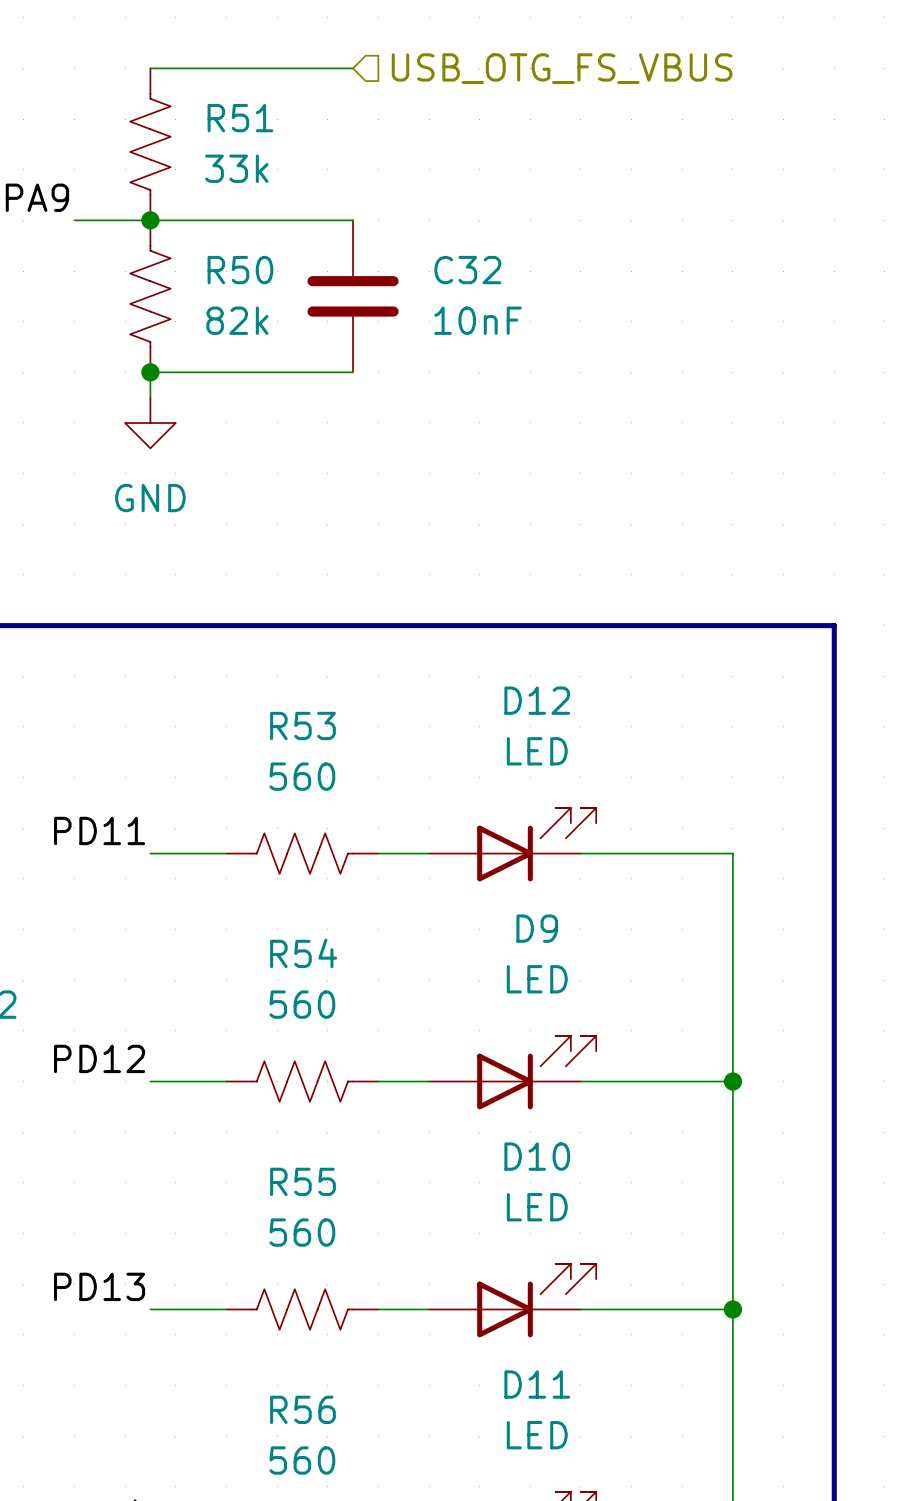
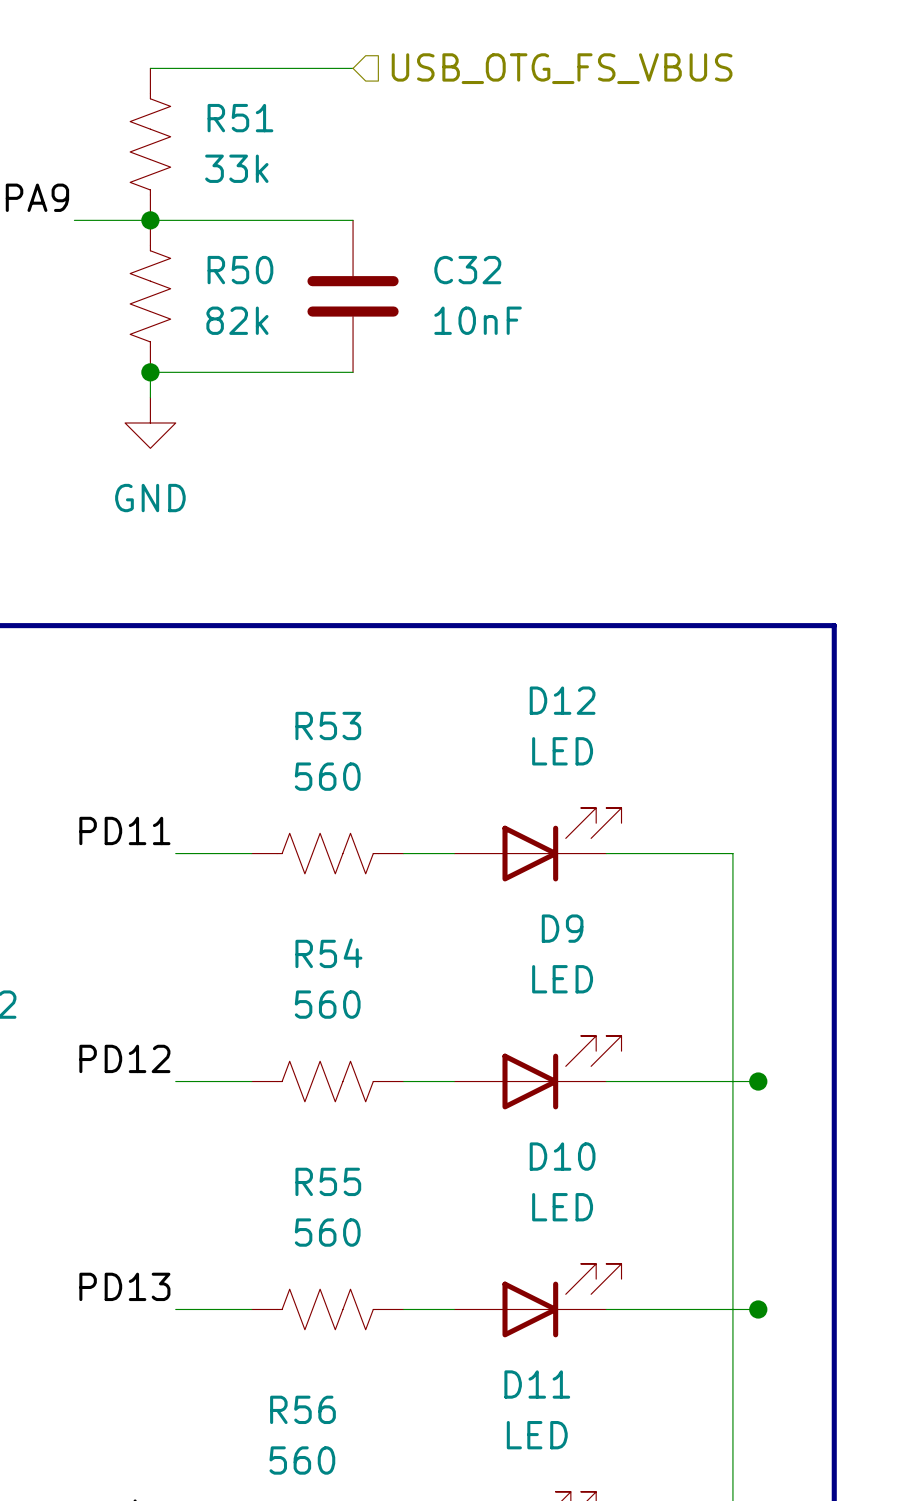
label position: PD11 (99, 830) -> PD11 (124, 830)
D12 position: (512, 844) -> (537, 844)
wire: (150, 853) (175, 853) -> none
R53 position: (302, 853) -> (327, 853)
label position: PD12 (99, 1058) -> PD12 (124, 1058)
D9 position: (512, 1072) -> (537, 1072)
wire: (150, 1081) (175, 1081) -> none
R54 position: (302, 1081) -> (327, 1081)
wire: none -> (732, 1081) (758, 1081)
junction position: (732, 1081) -> (758, 1081)
label position: PD13 (99, 1286) -> PD13 (124, 1286)
D10 position: (512, 1300) -> (537, 1300)
wire: (150, 1309) (175, 1309) -> none
R55 position: (302, 1309) -> (327, 1309)
wire: none -> (732, 1309) (758, 1309)
junction position: (732, 1309) -> (758, 1309)

